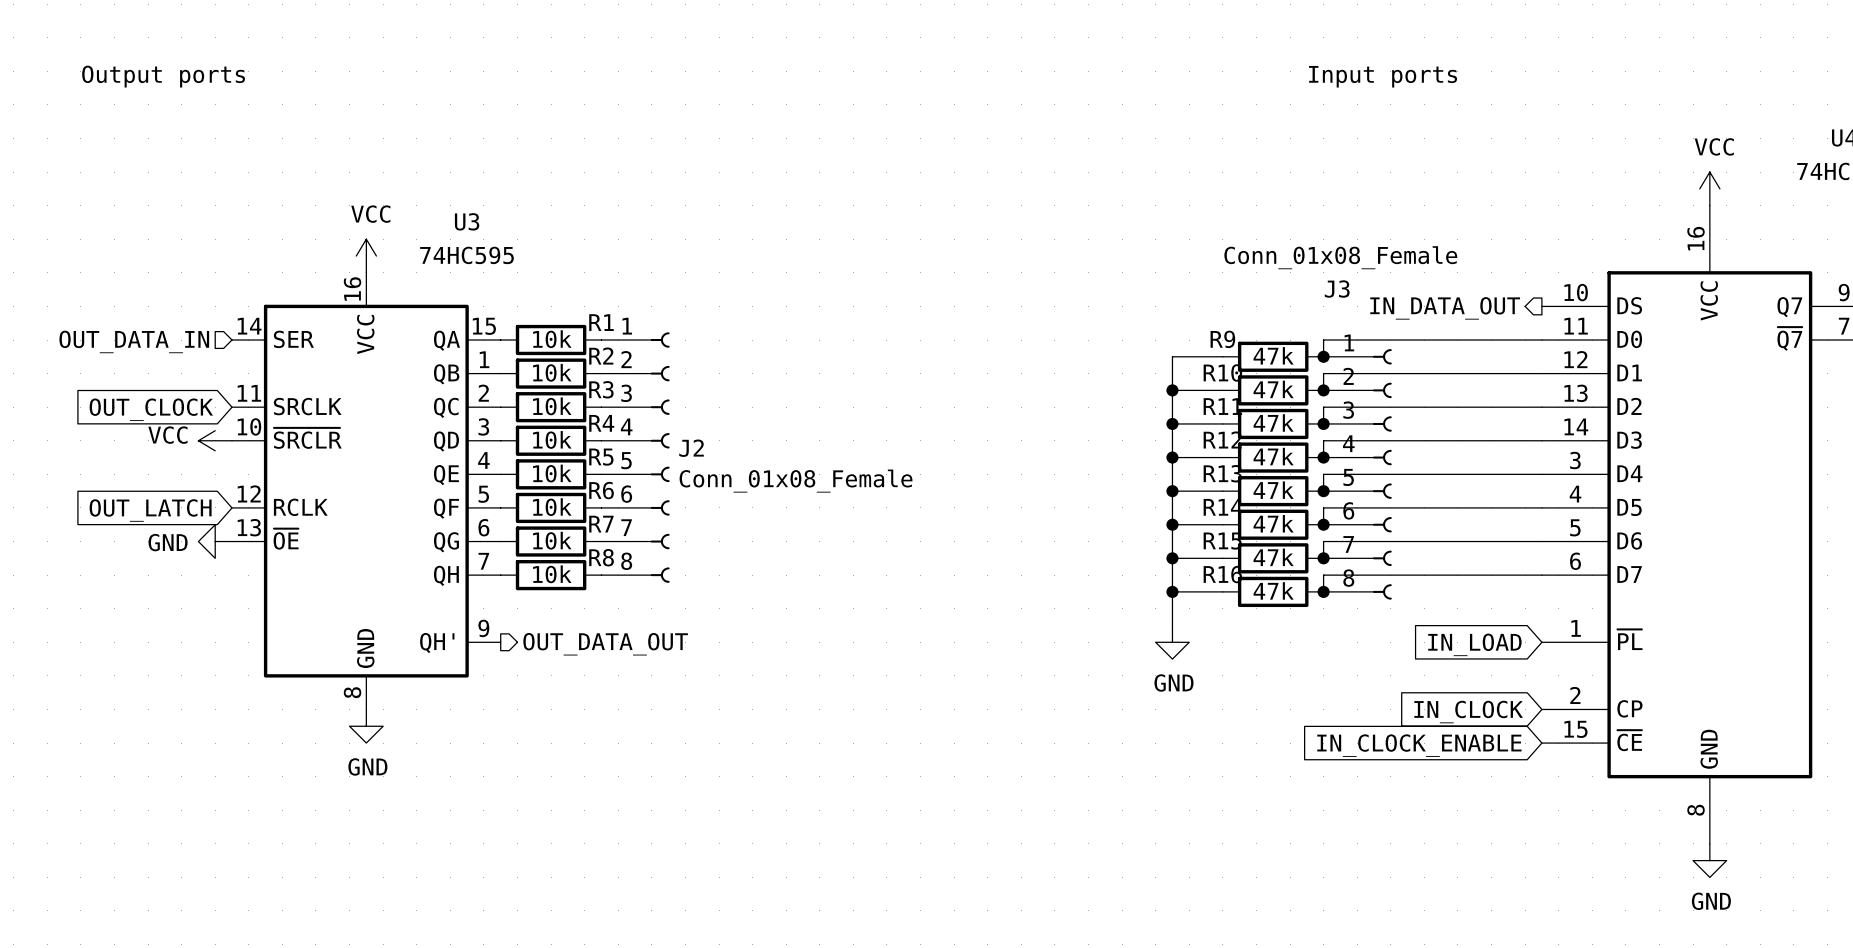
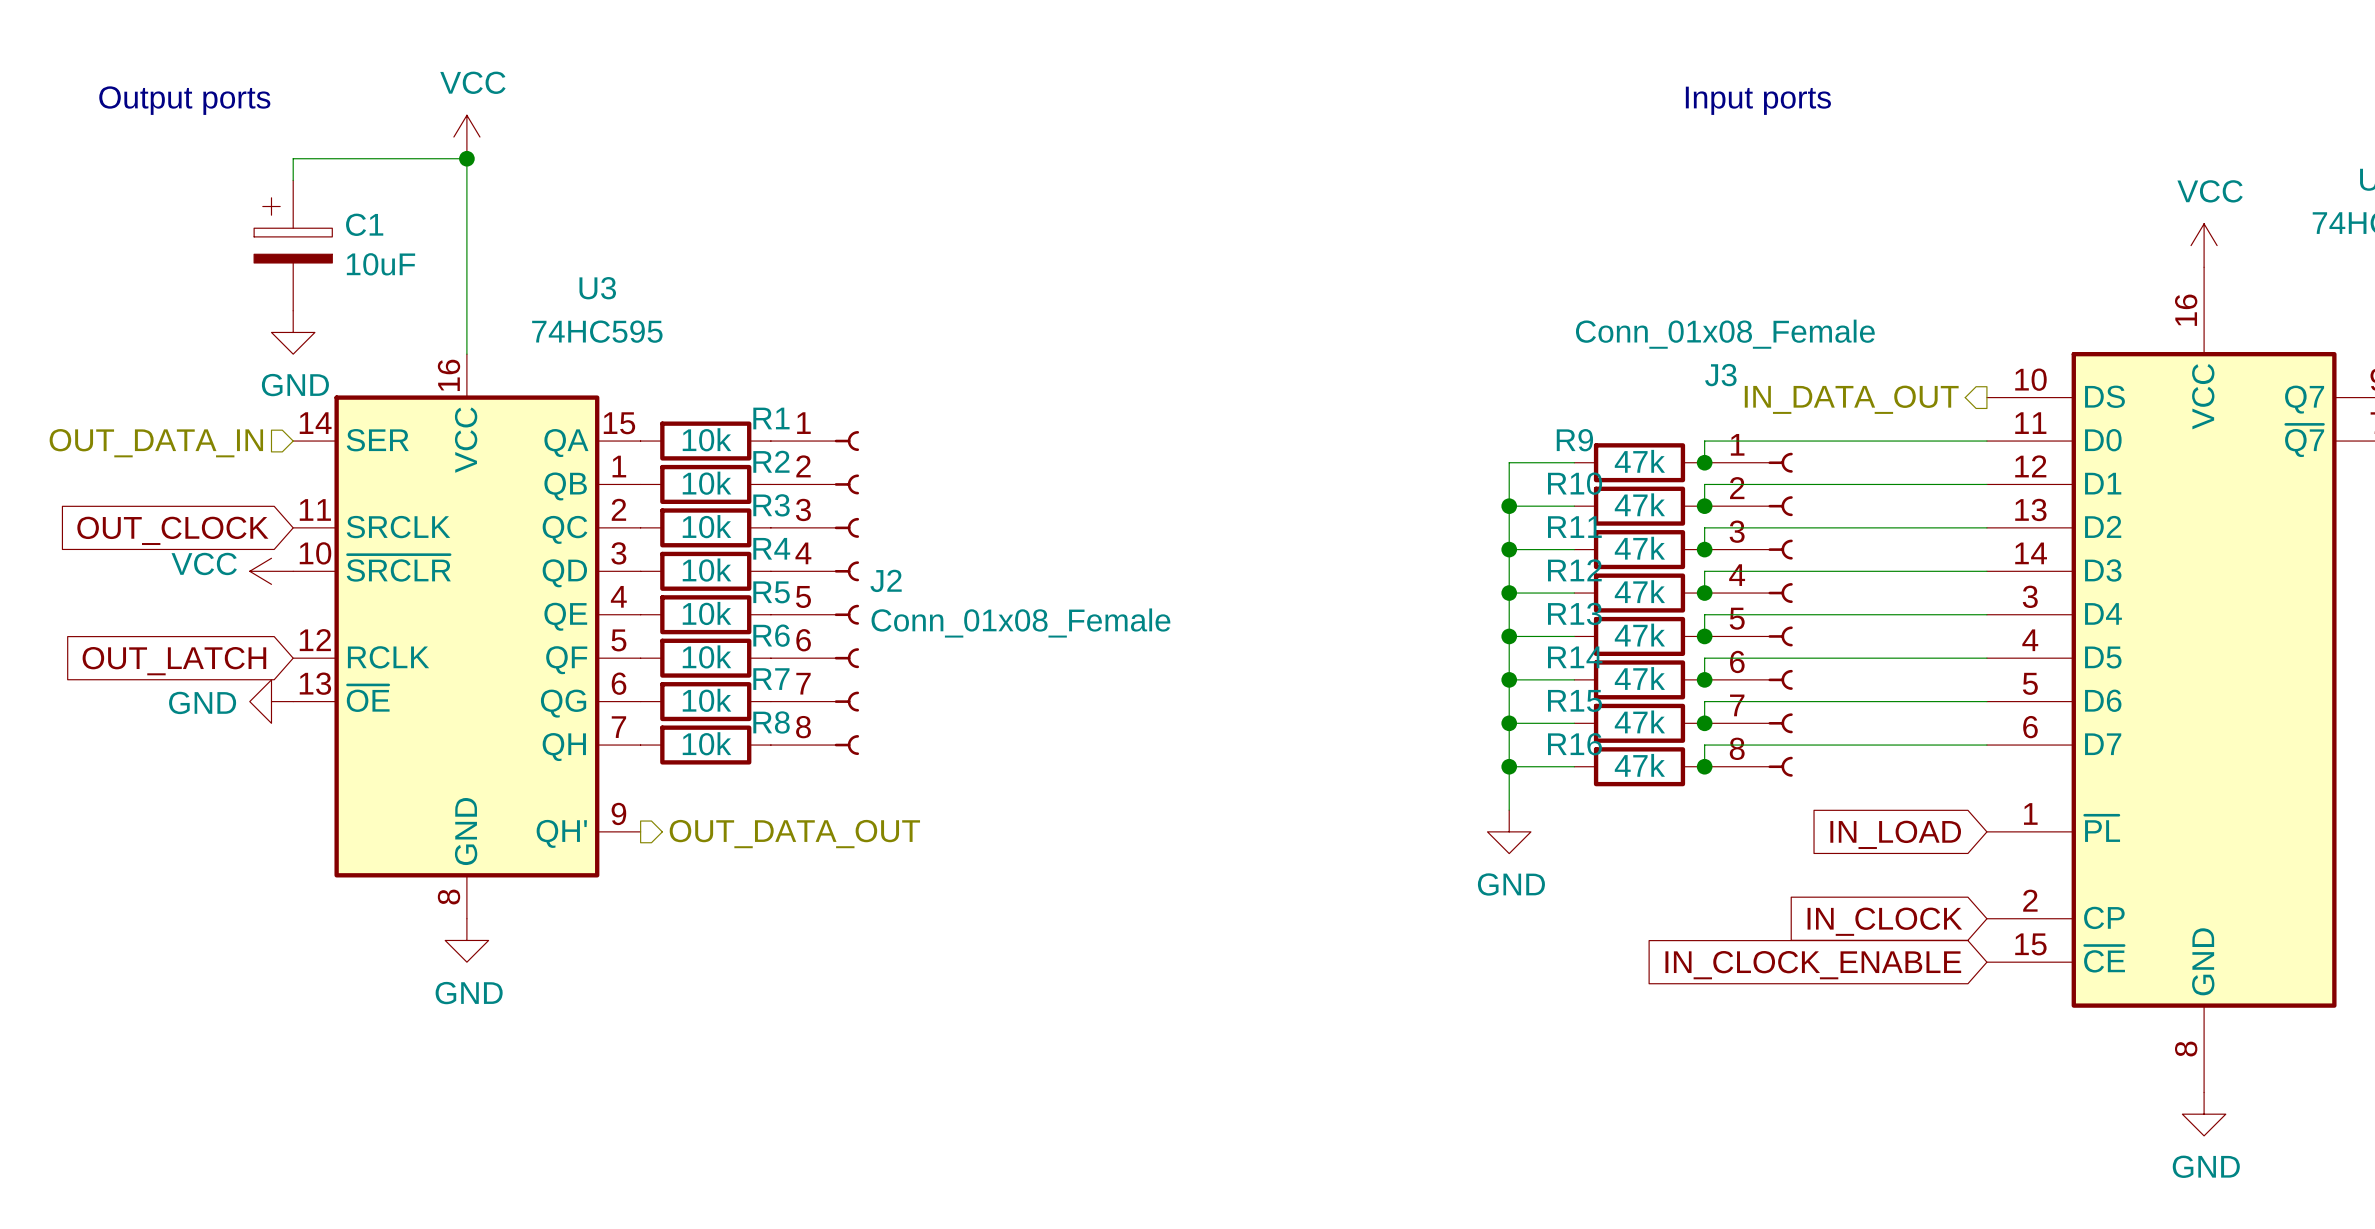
junction: none -> (466, 158)
wire: none -> (293, 180) (293, 158) (466, 158) (466, 354)
C1: none -> 10uF (293, 245)
power symbol: none -> GND (293, 332)
power symbol position: VCC (366, 256) -> VCC (466, 137)

